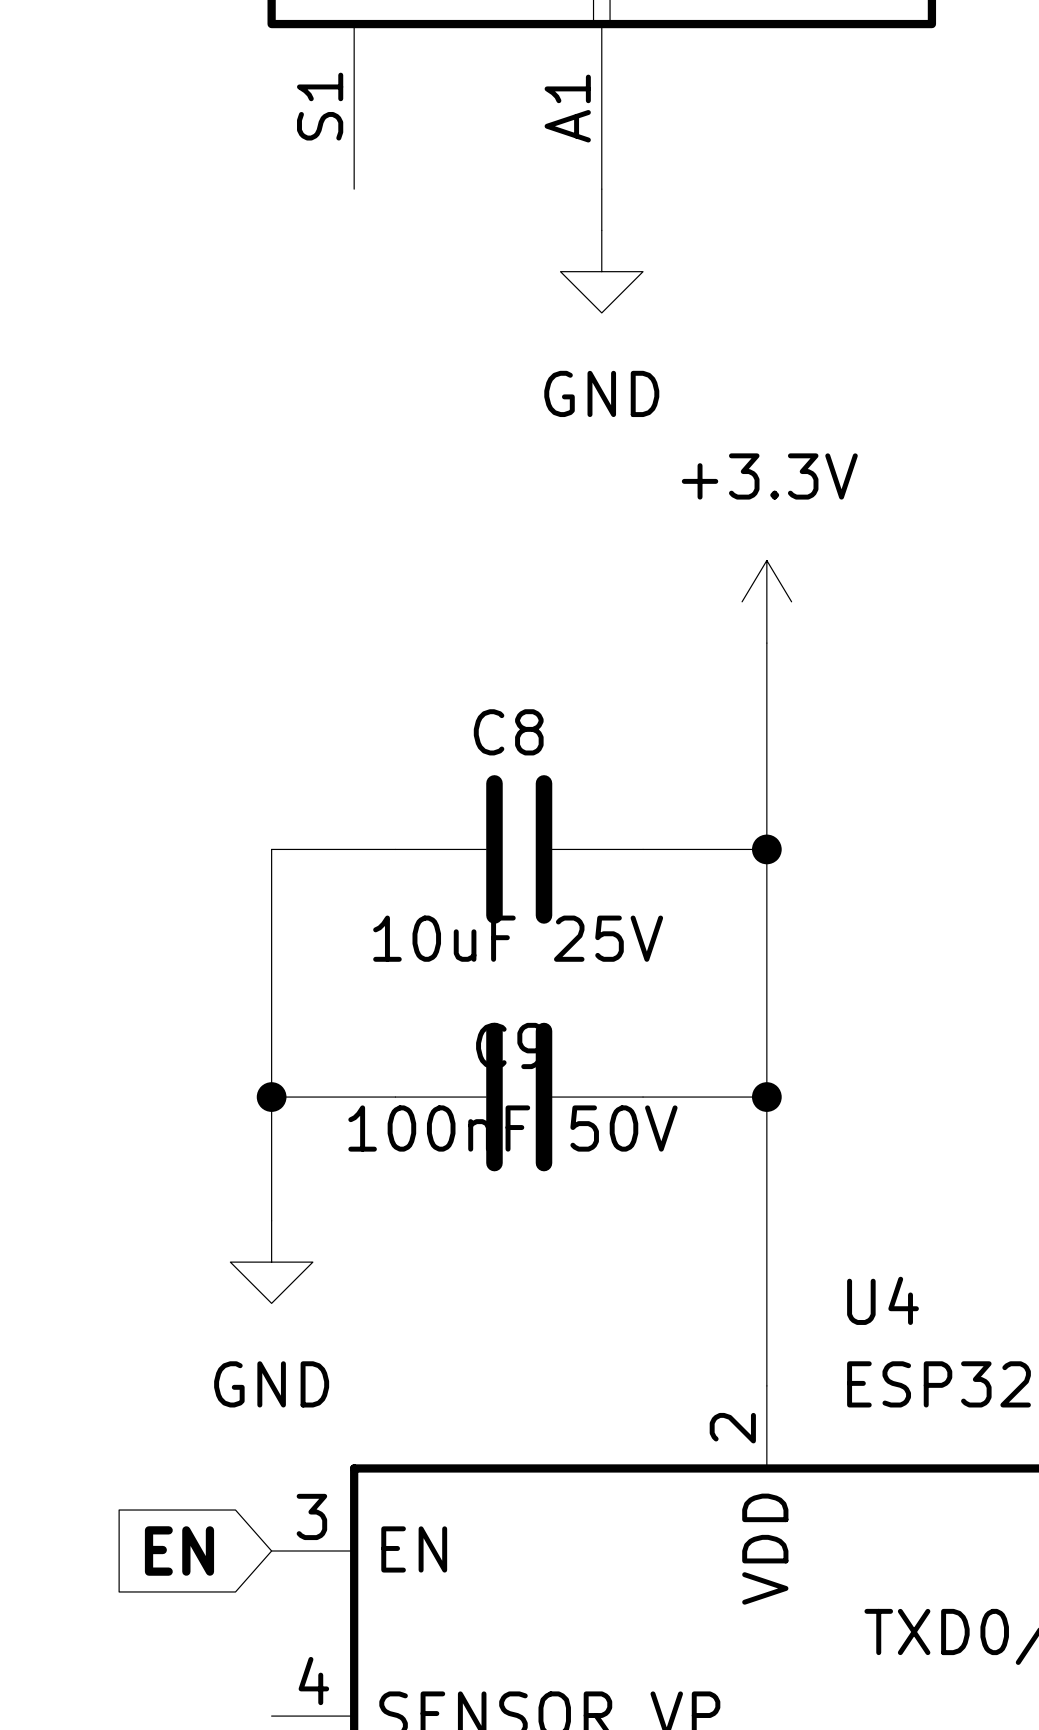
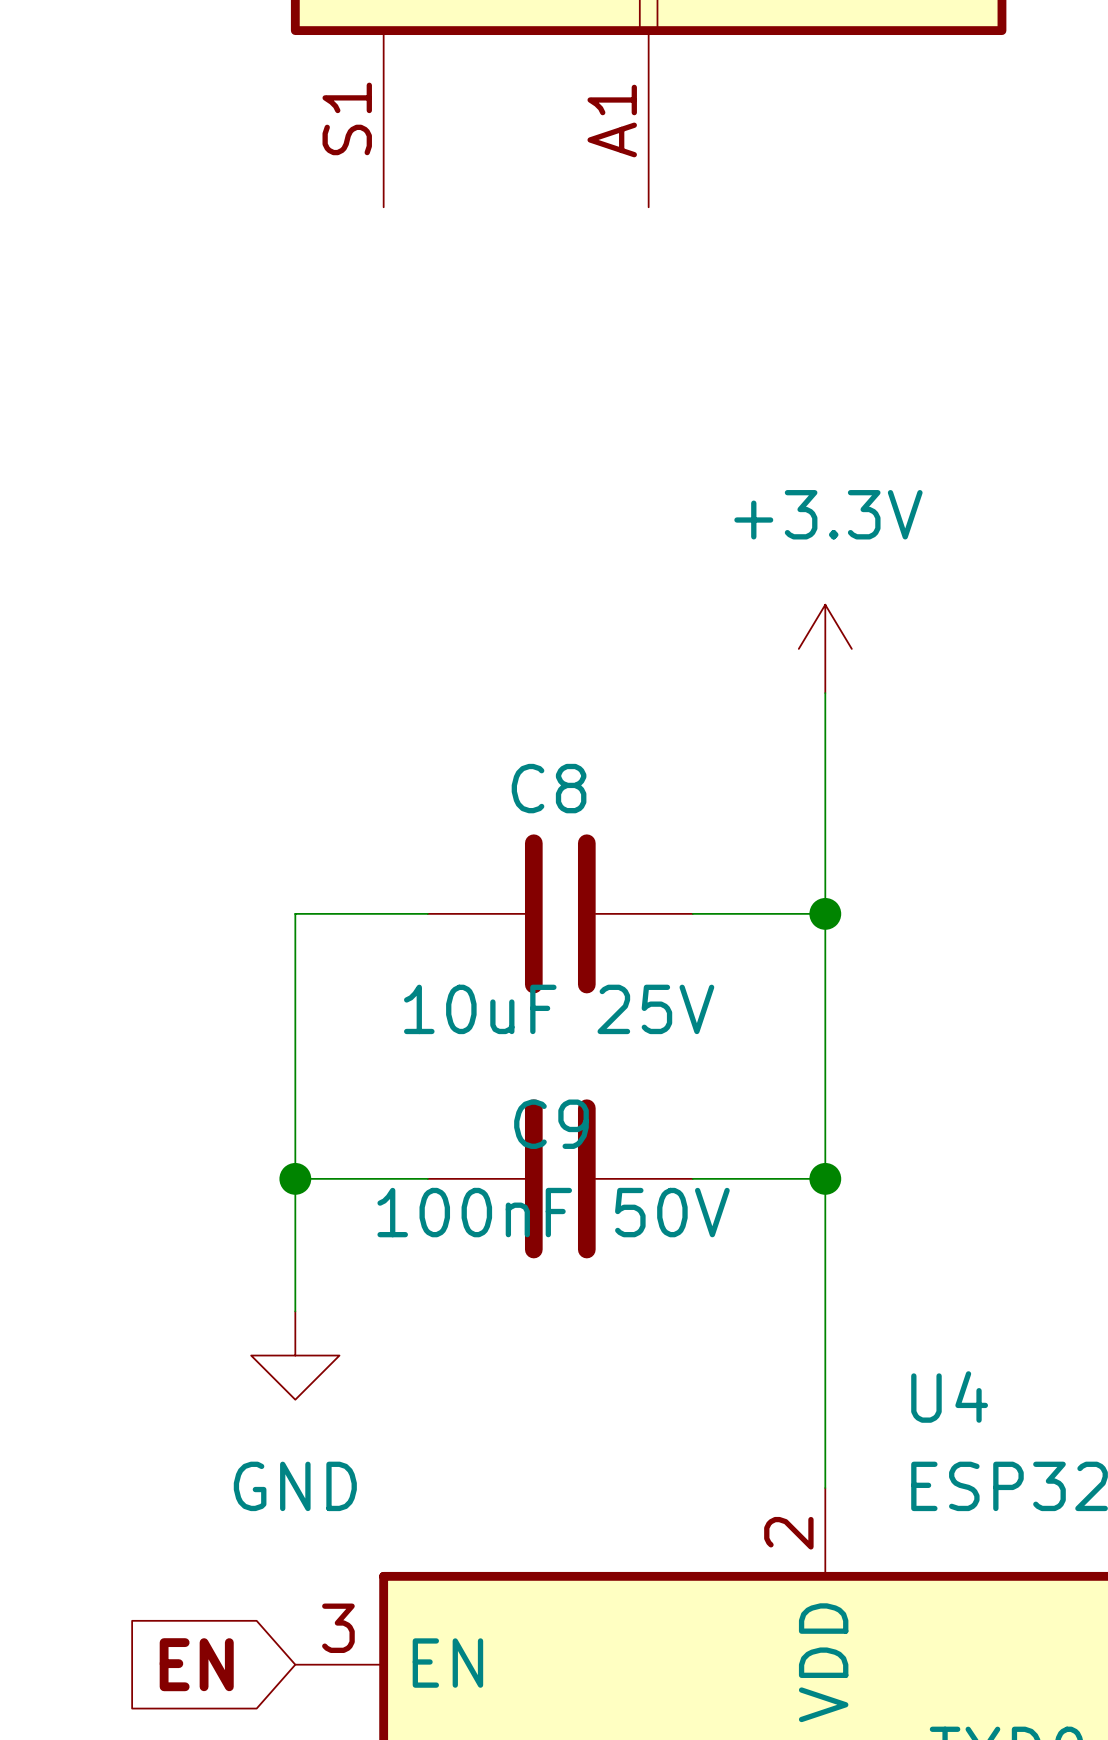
wire: (601, 189) (601, 230) -> none
power symbol: GND (601, 271) -> none

